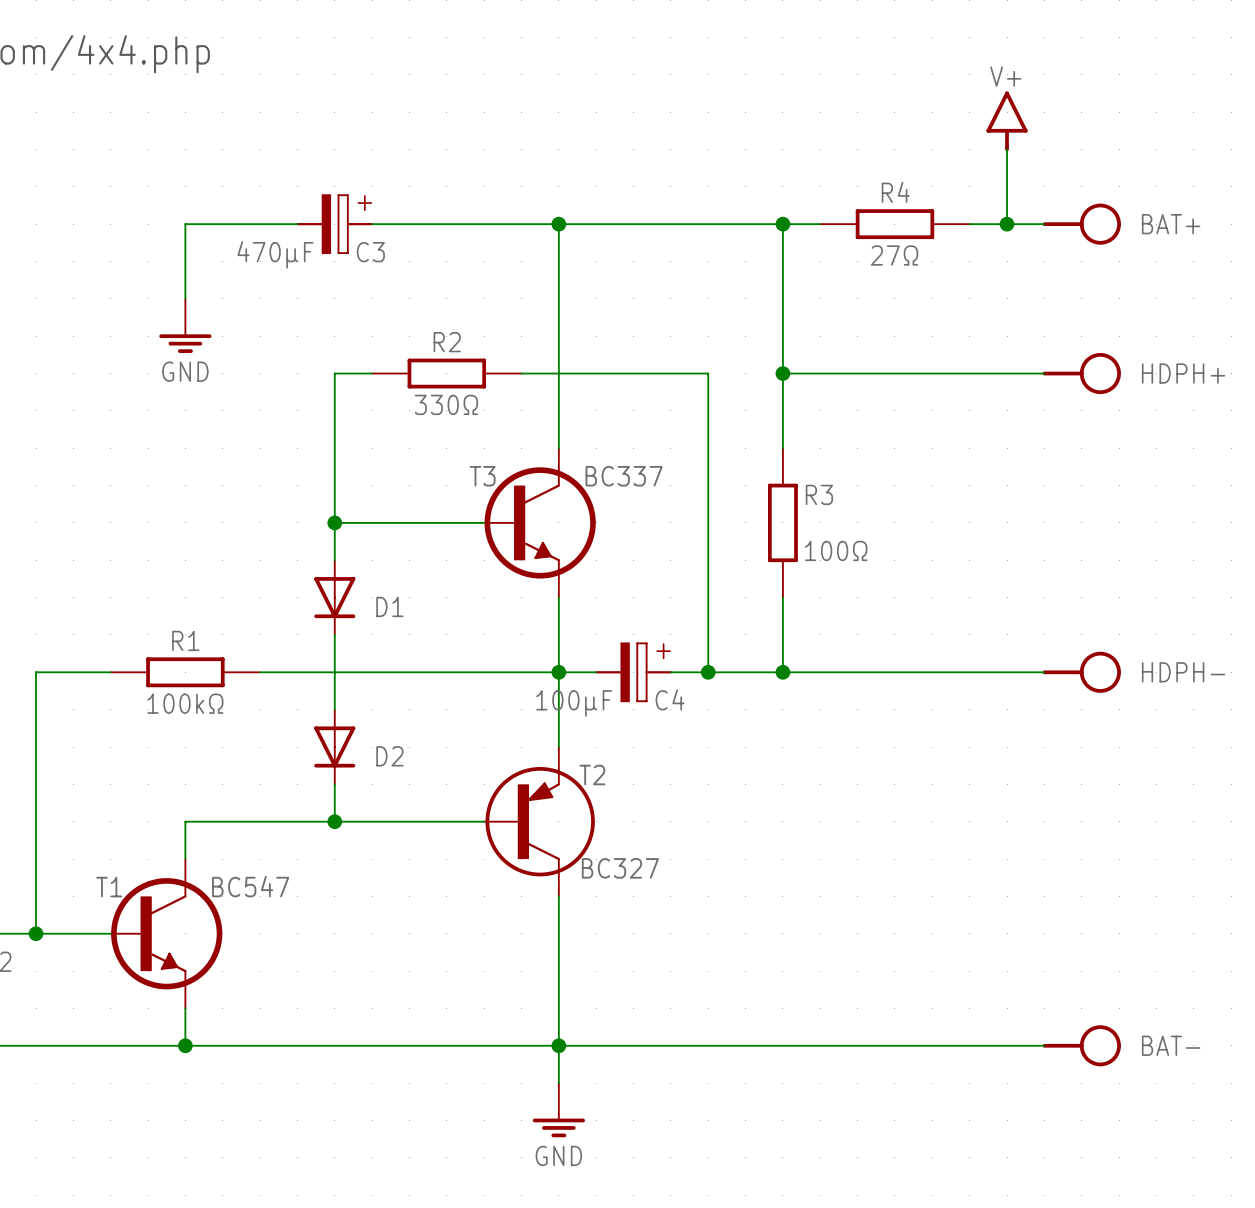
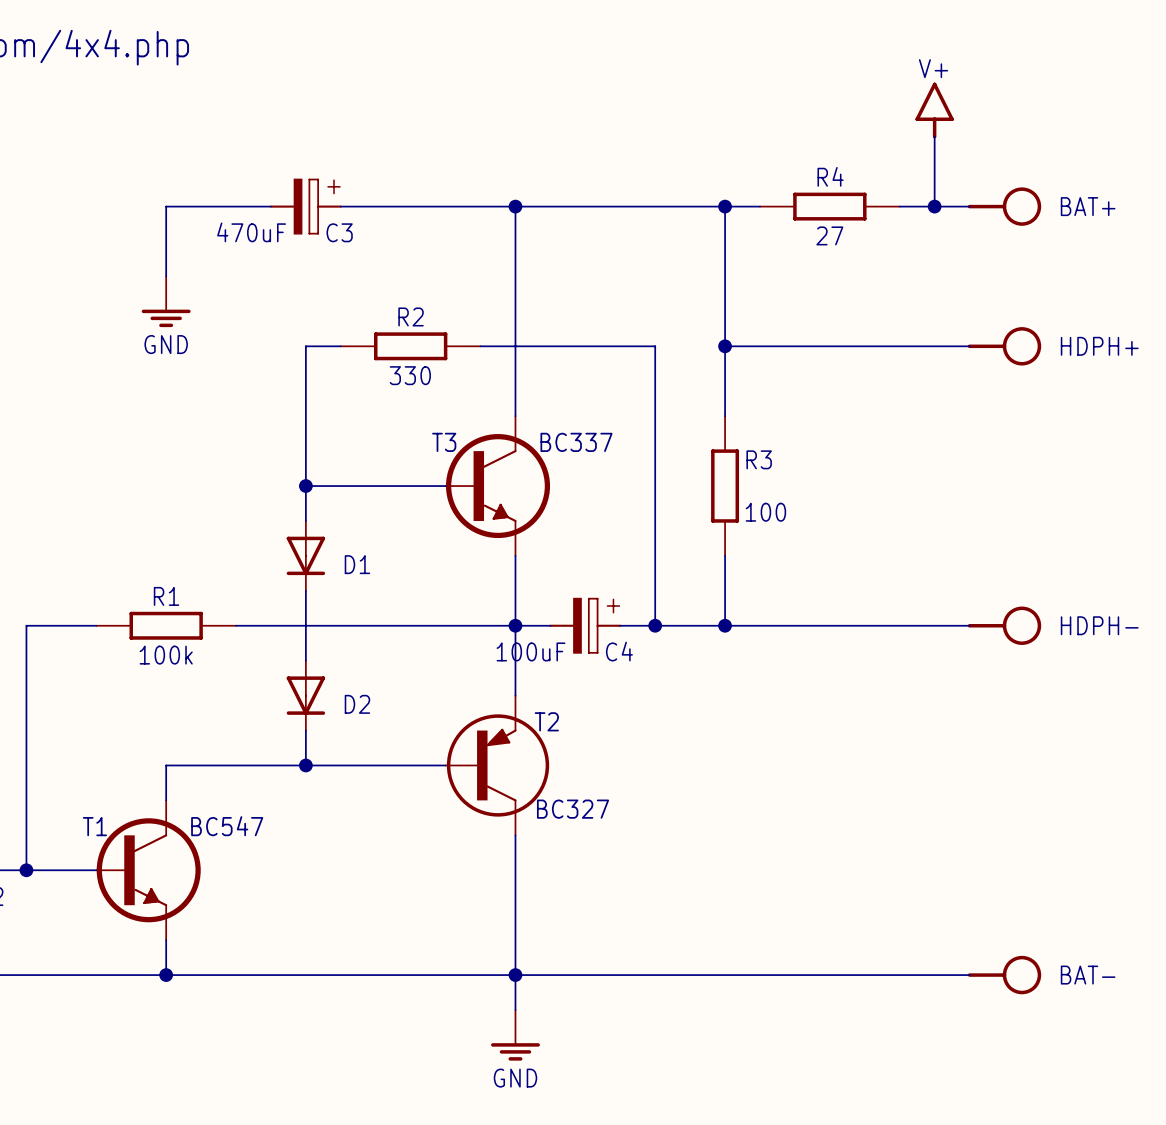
C3 value: 470μF (275, 254) -> 470uF (251, 232)
R4 value: 27Ω (894, 255) -> 27 (829, 235)
R2 value: 330Ω (446, 404) -> 330 (410, 375)
R3 value: 100Ω (836, 550) -> 100 (765, 512)
R1 value: 100kΩ (185, 703) -> 100k (166, 655)
C4 value: 100μF (574, 703) -> 100uF (531, 651)

